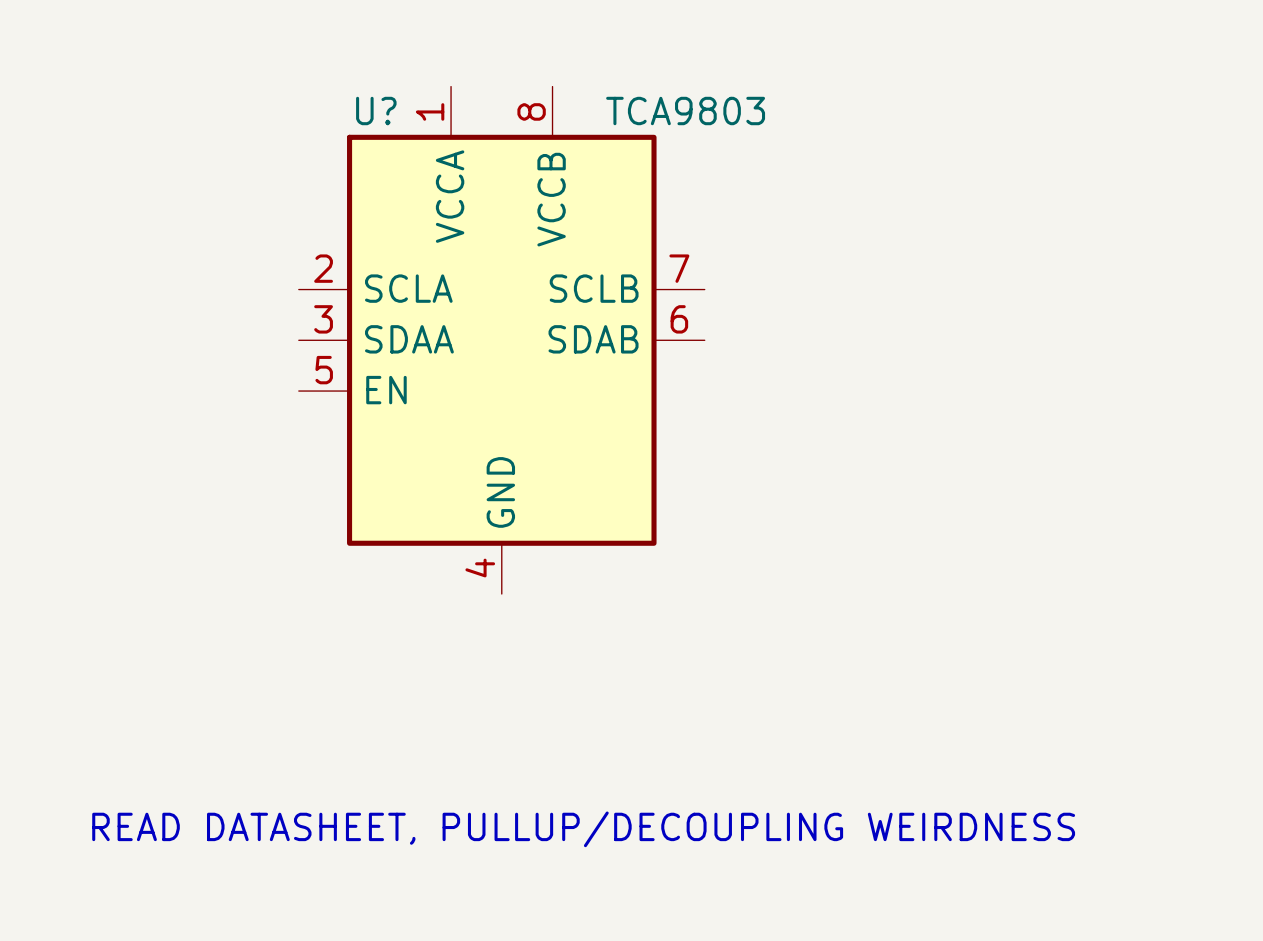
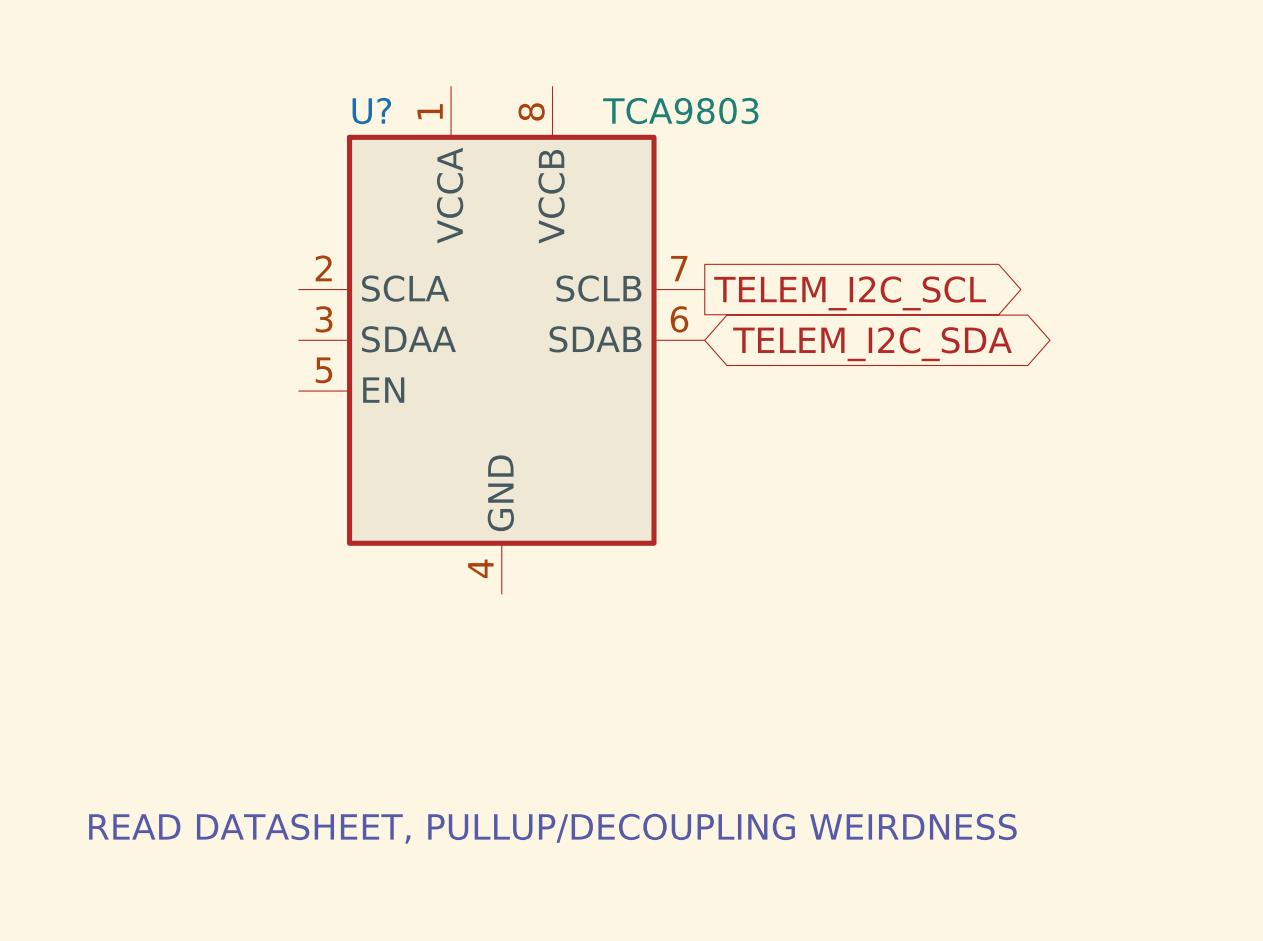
global label: none -> TELEM_I2C_SCL (850, 293)
global label: none -> TELEM_I2C_SDA (872, 344)

